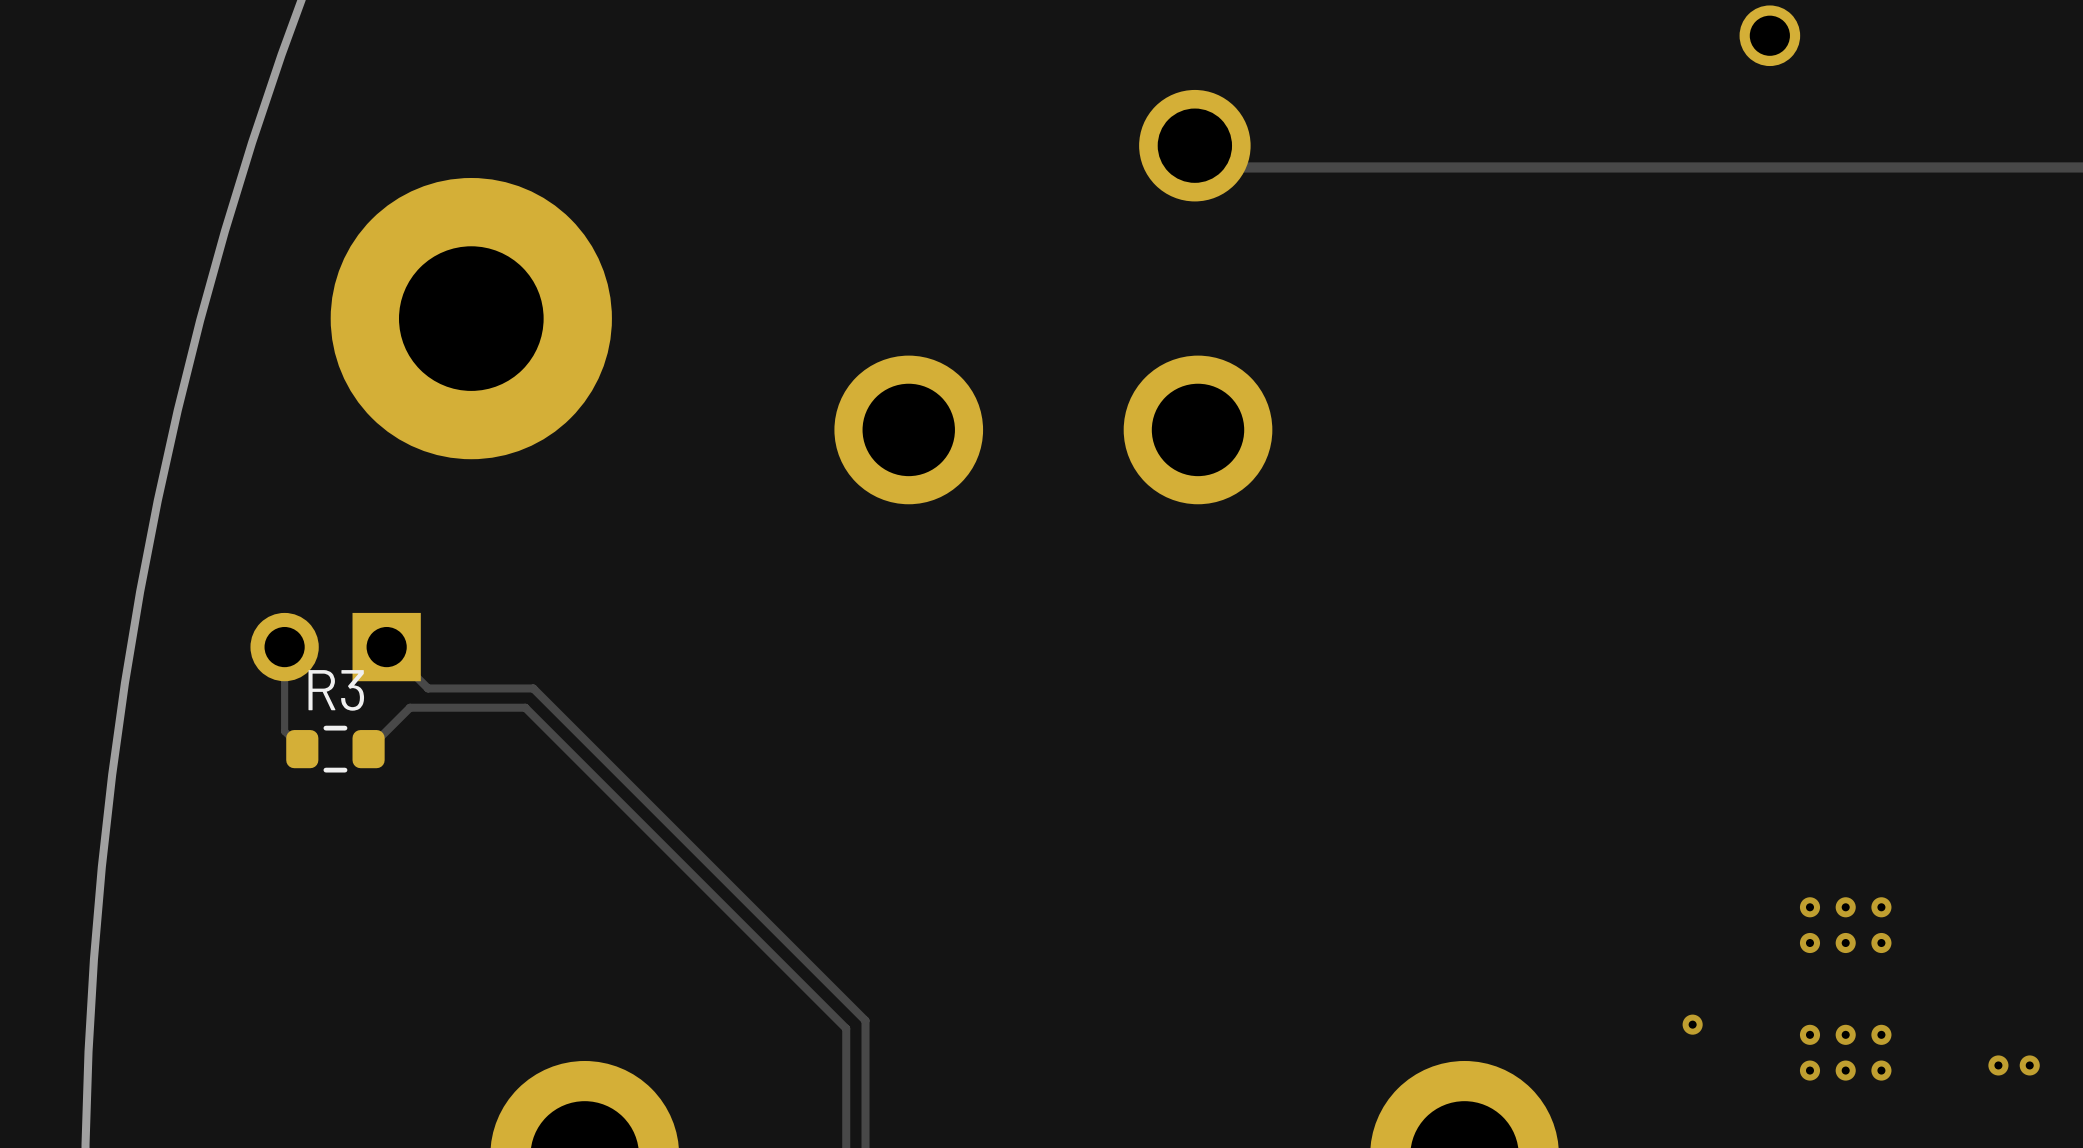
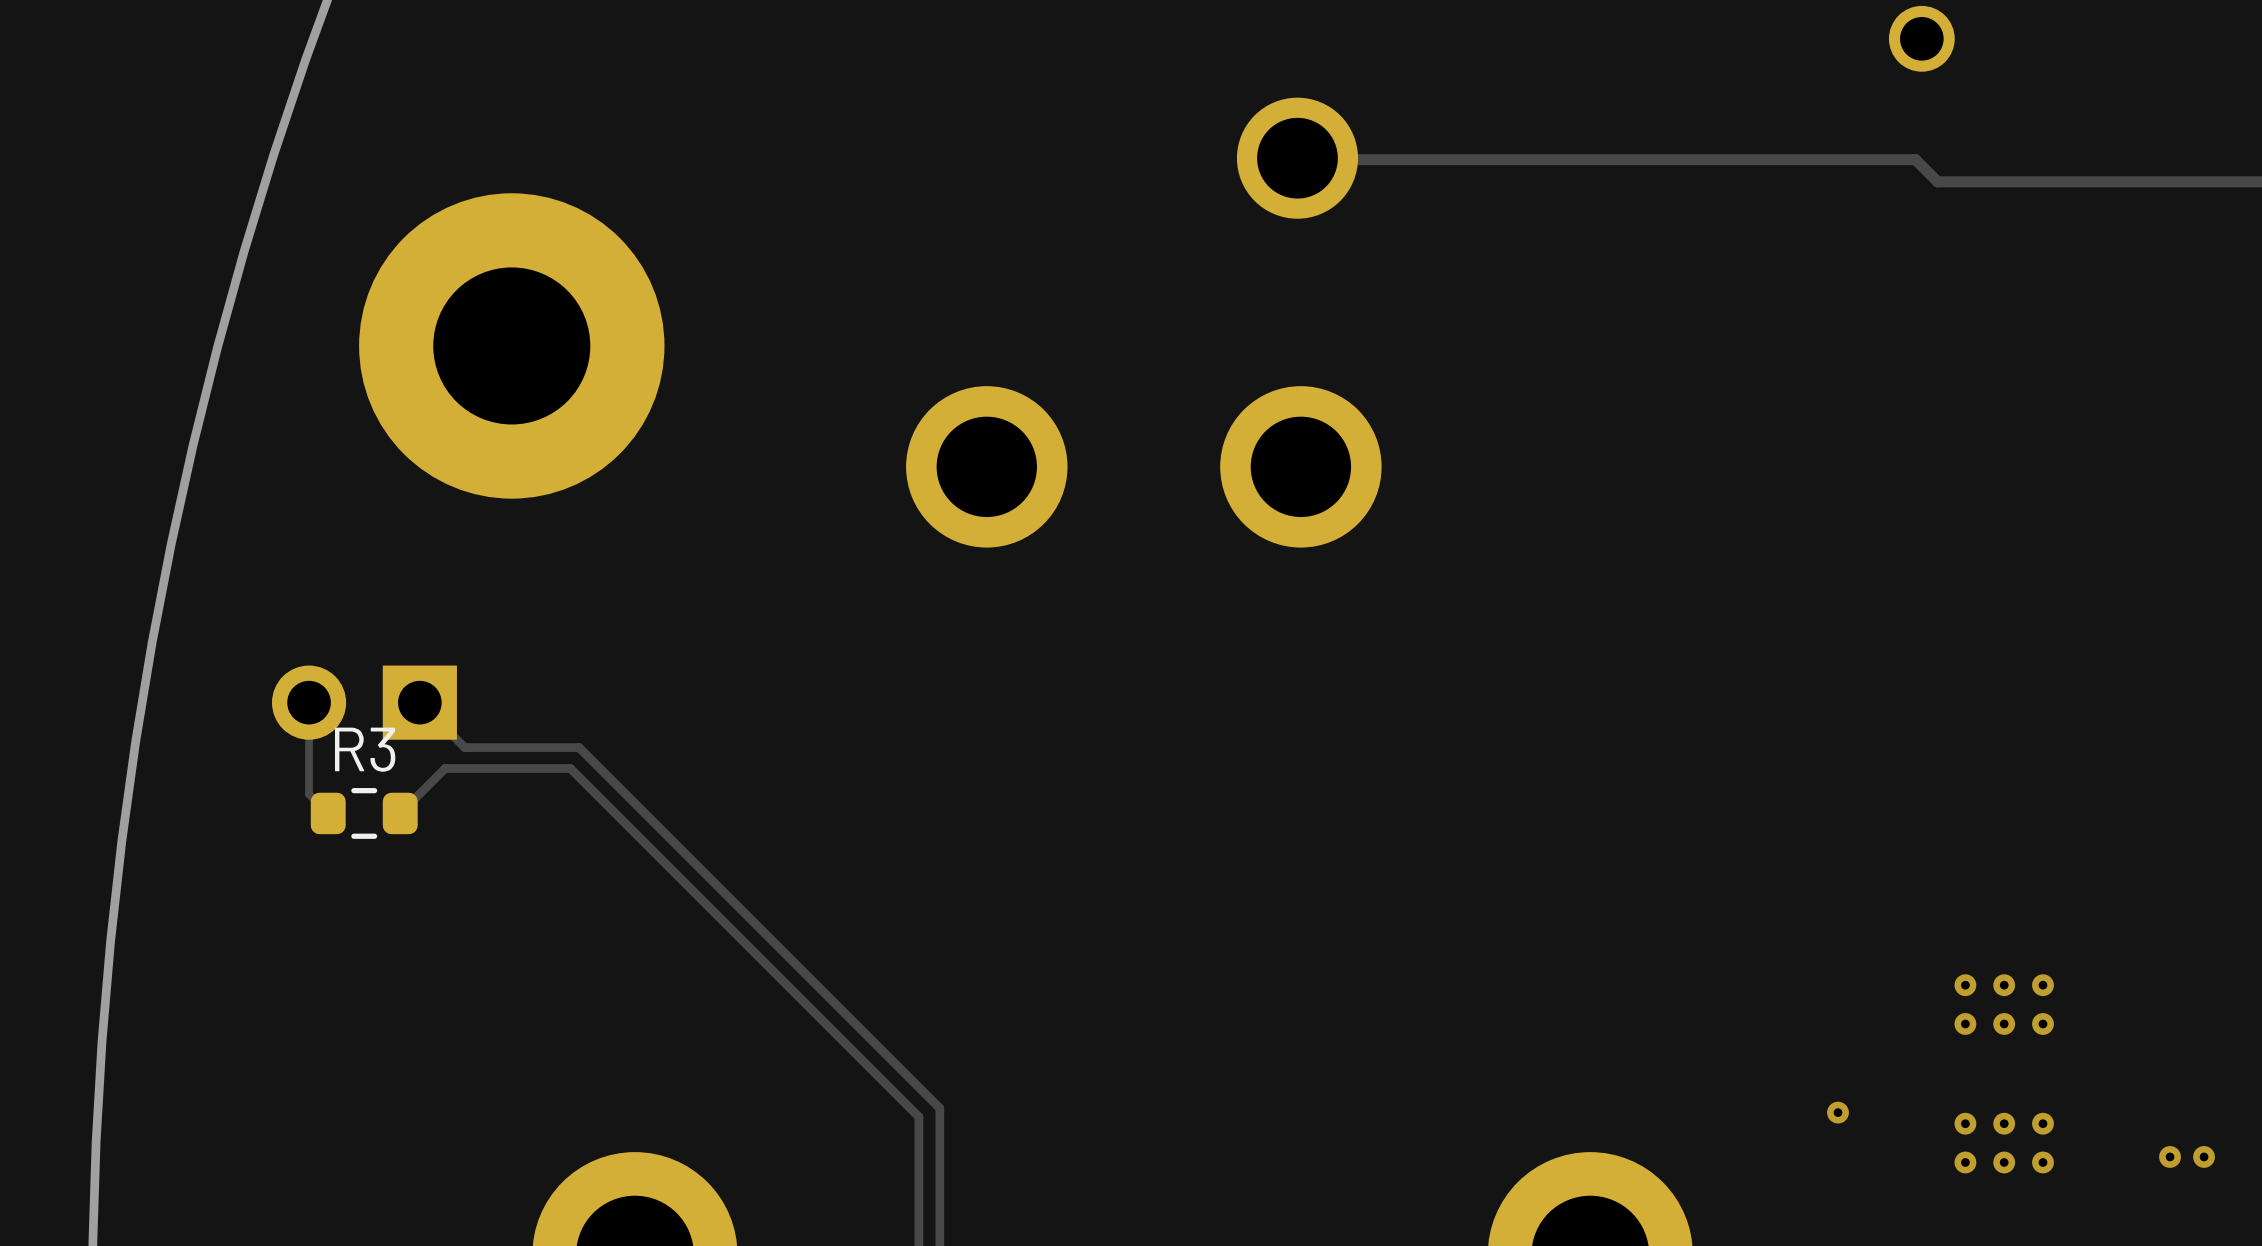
track: (1194, 145) (1216, 167) (1784, 167) -> (1350, 159) (1915, 159) (1937, 181)

